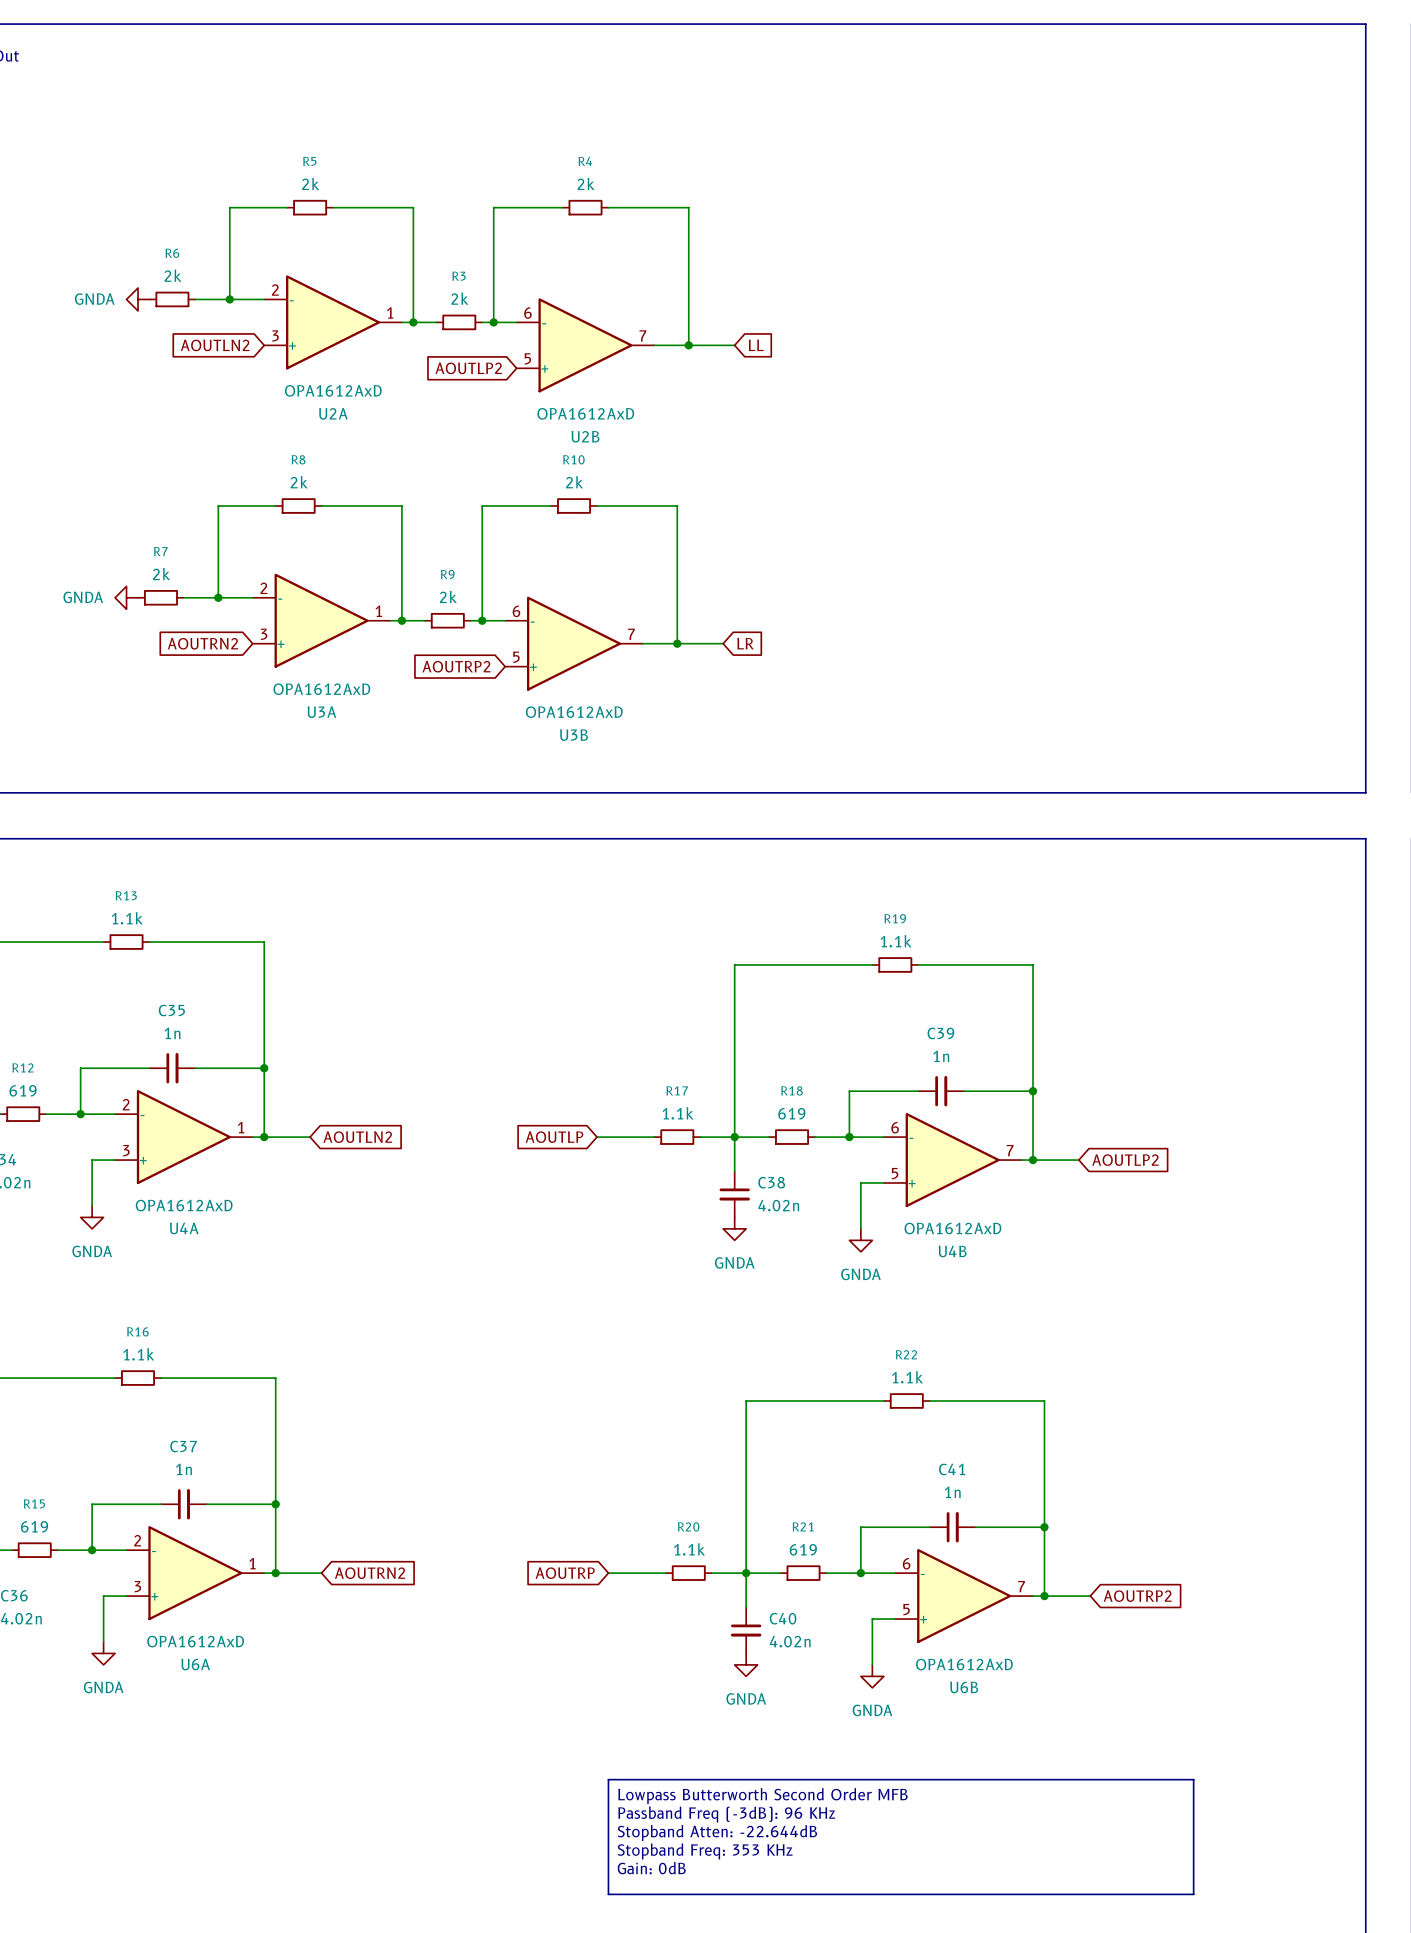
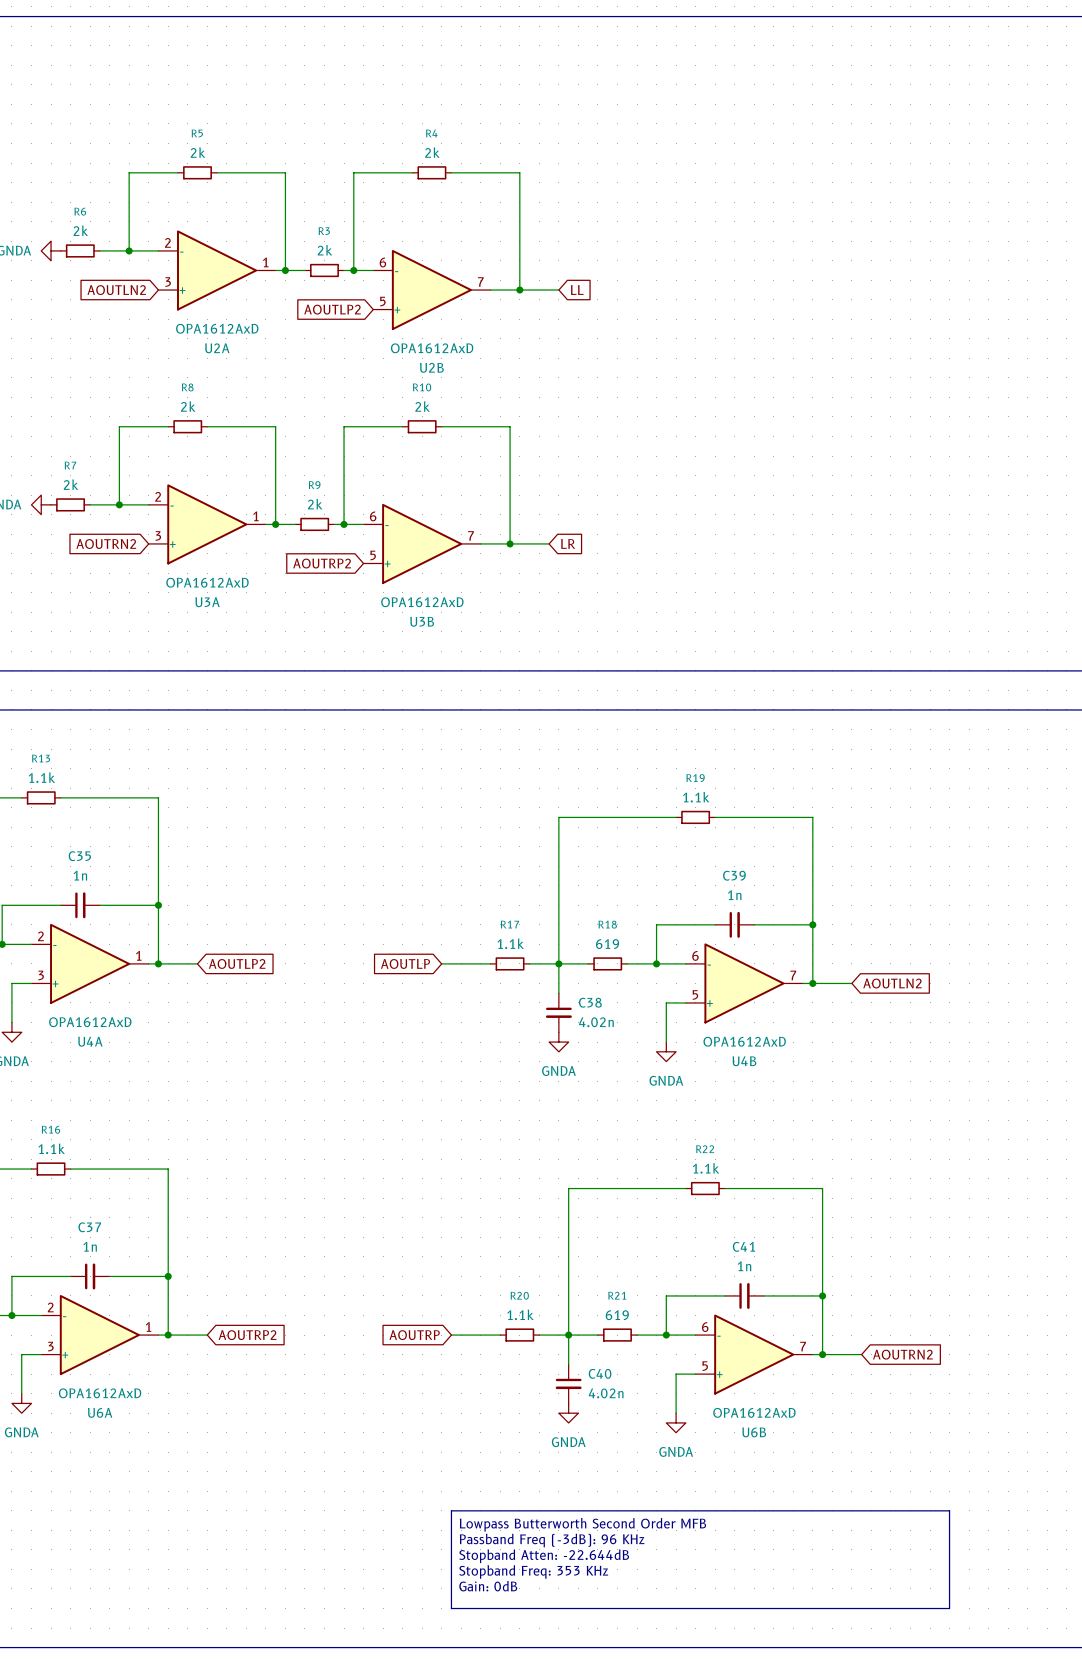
global label: AOUTLN2 (357, 1137) -> AOUTLP2 (237, 963)
global label: AOUTLP2 (1125, 1160) -> AOUTLN2 (892, 983)
global label: AOUTRN2 (370, 1573) -> AOUTRP2 (247, 1335)
global label: AOUTRP2 (1137, 1596) -> AOUTRN2 (902, 1354)

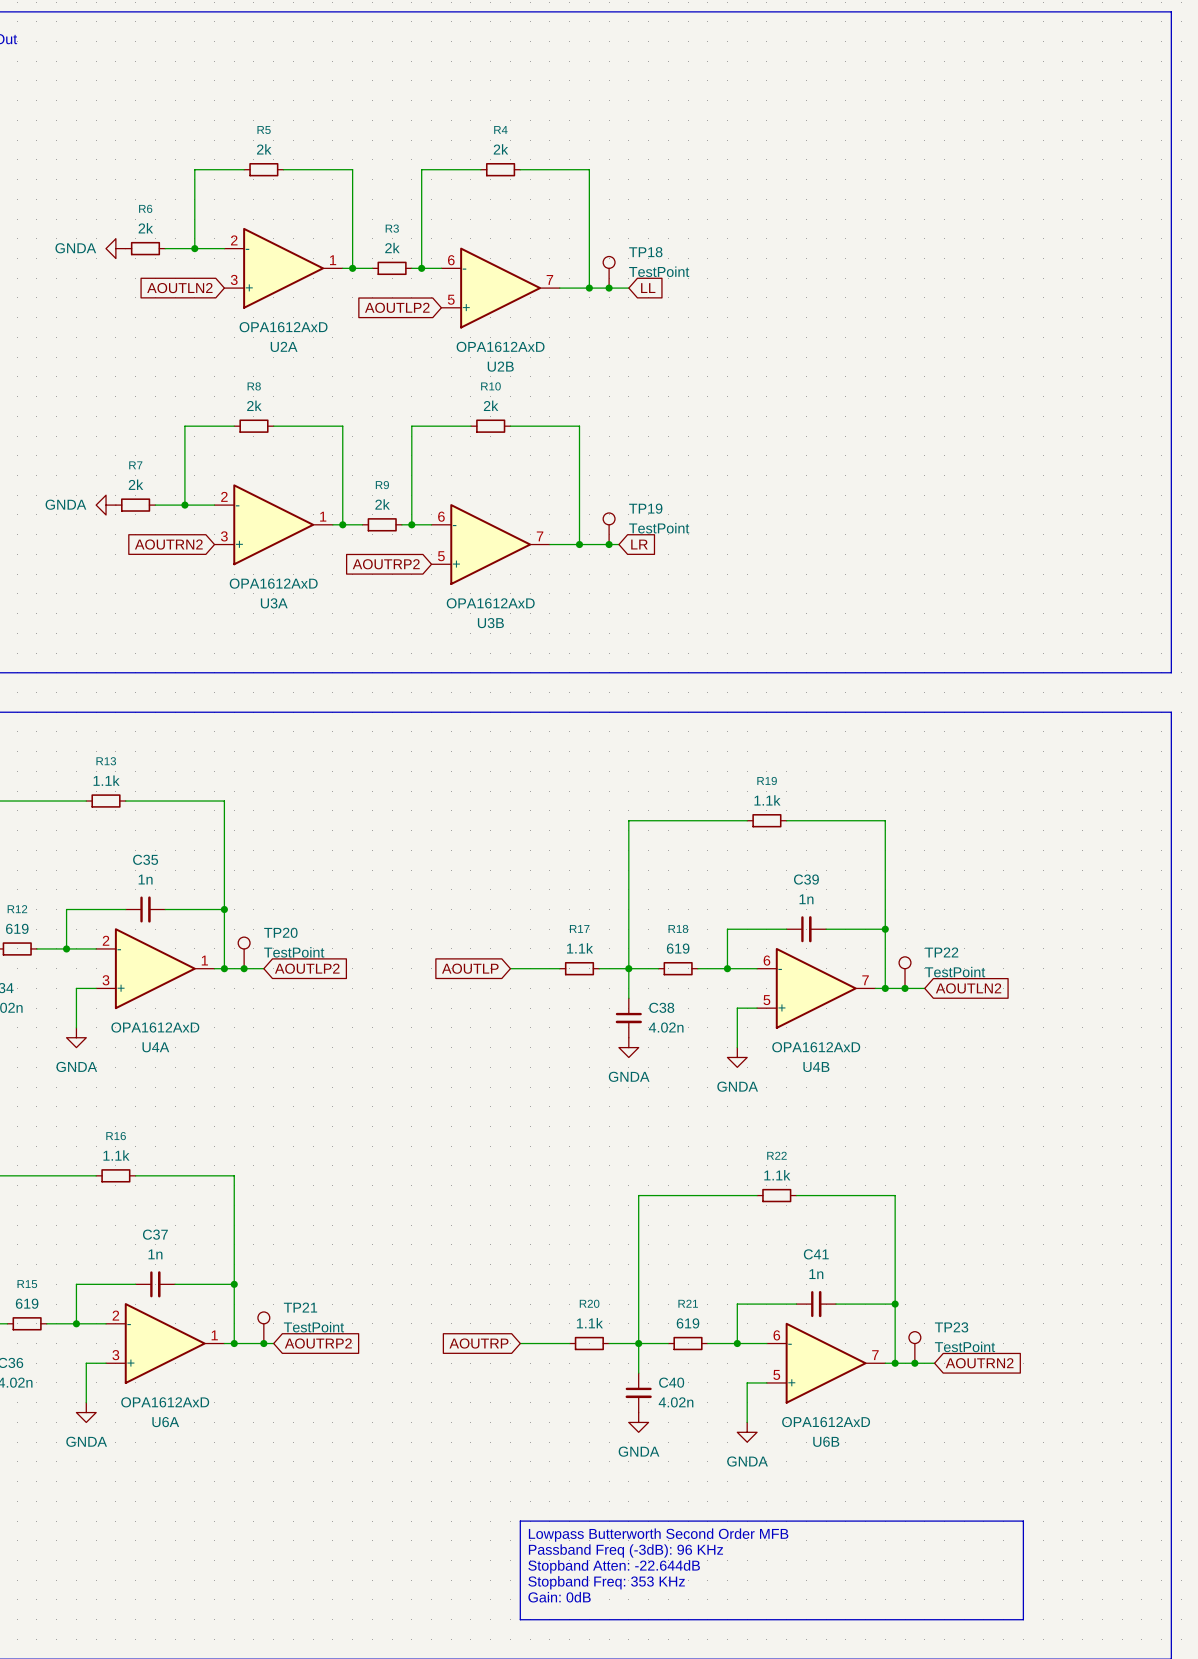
TP18: none -> TestPoint (609, 272)
junction: none -> (609, 288)
TP19: none -> TestPoint (609, 528)
junction: none -> (609, 544)
TP20: none -> TestPoint (244, 952)
junction: none -> (244, 968)
TP22: none -> TestPoint (905, 972)
junction: none -> (905, 988)
TP21: none -> TestPoint (263, 1327)
junction: none -> (263, 1343)
TP23: none -> TestPoint (914, 1347)
junction: none -> (914, 1363)

